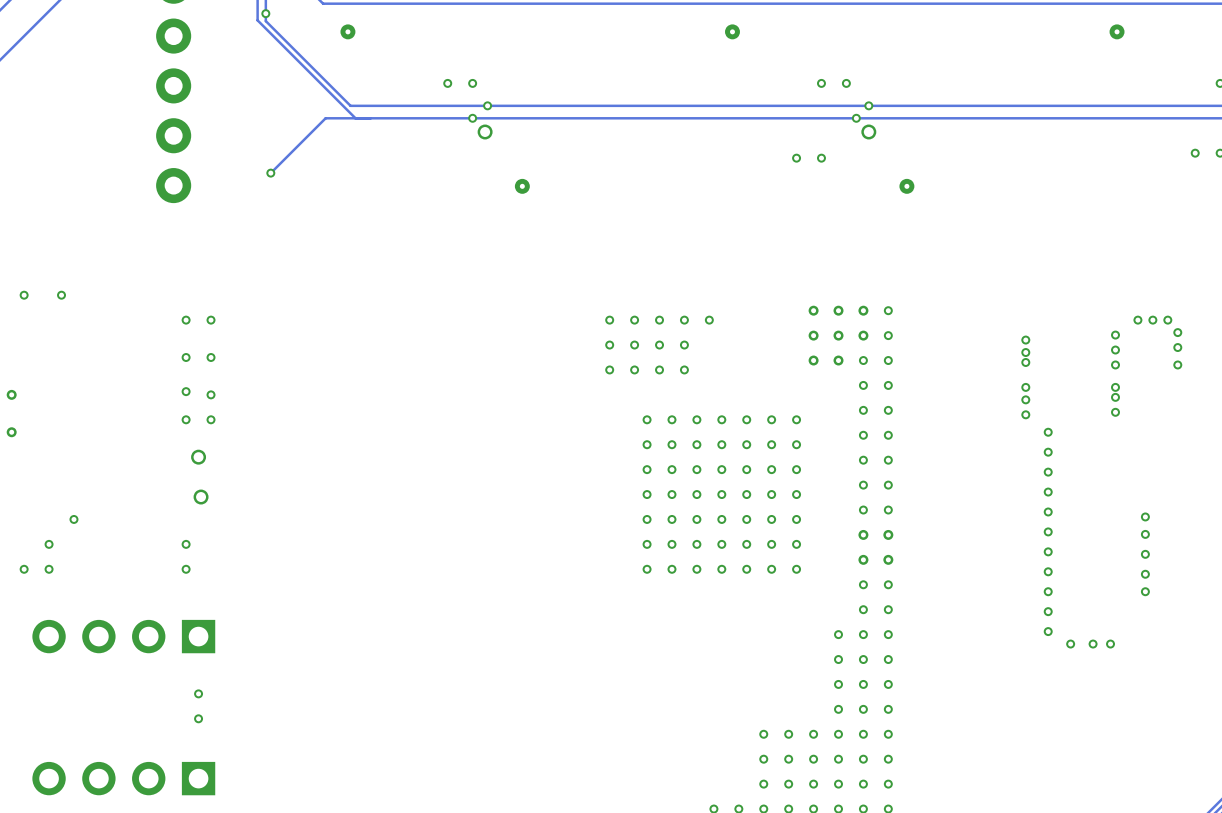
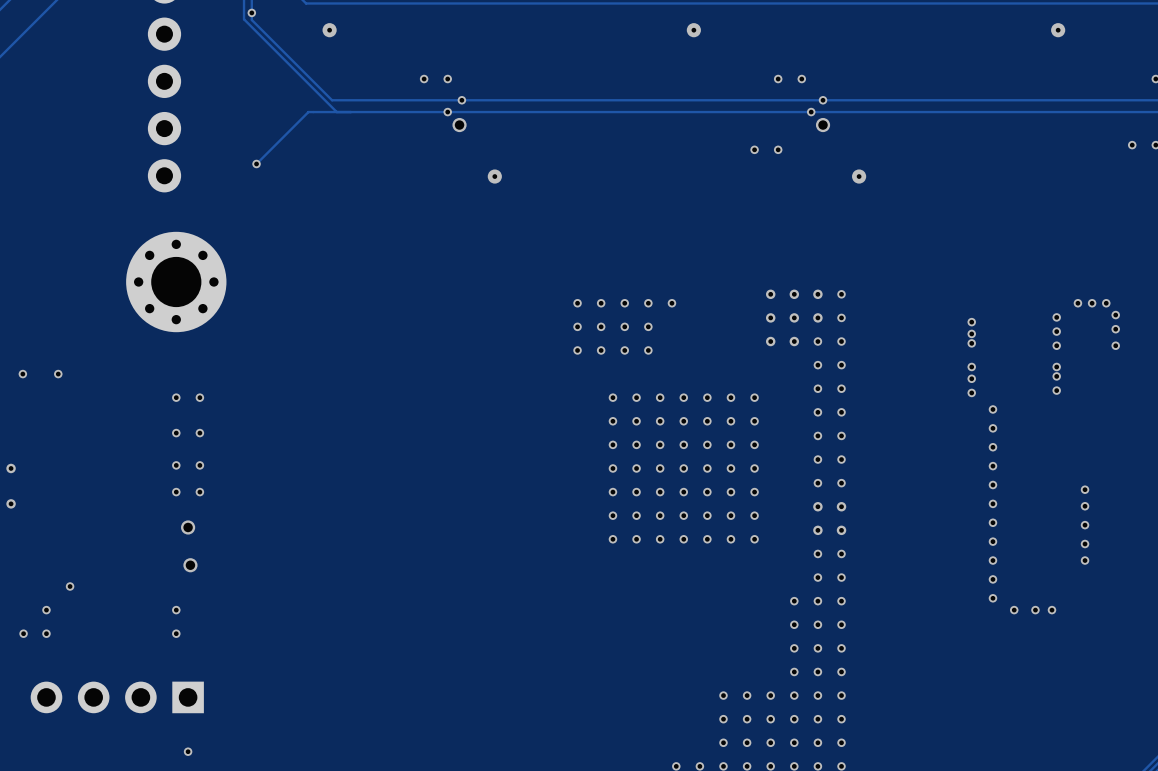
via: (24, 295) -> none
via: (61, 295) -> none
part: none -> (176, 282)
via: (186, 320) -> none
via: (211, 320) -> none
via: (186, 357) -> none
via: (211, 357) -> none
via: (186, 391) -> none
via: (11, 394) -> none
via: none -> (22, 374)
via: none -> (58, 374)
via: (211, 394) -> none
via: (11, 432) -> none
via: none -> (176, 433)
via: (198, 457) -> none
via: none -> (199, 433)
via size: [193, 489, 209, 505] -> [195, 461, 205, 470]
via: none -> (176, 465)
via: none -> (11, 468)
via: (73, 519) -> none
via: none -> (176, 492)
via: none -> (199, 492)
via: none -> (11, 503)
via: (49, 544) -> none
via: (186, 544) -> none
via: none -> (188, 527)
via: (24, 569) -> none
via: (49, 569) -> none
via: (186, 569) -> none
via: none -> (190, 565)
via: none -> (70, 586)
part: (123, 636) -> none
via: none -> (46, 610)
via: none -> (176, 610)
via: none -> (23, 633)
via: none -> (46, 633)
via: none -> (176, 633)
via: (198, 693) -> none
via: (198, 718) -> none
part position: (123, 778) -> (117, 697)
via: none -> (188, 751)

